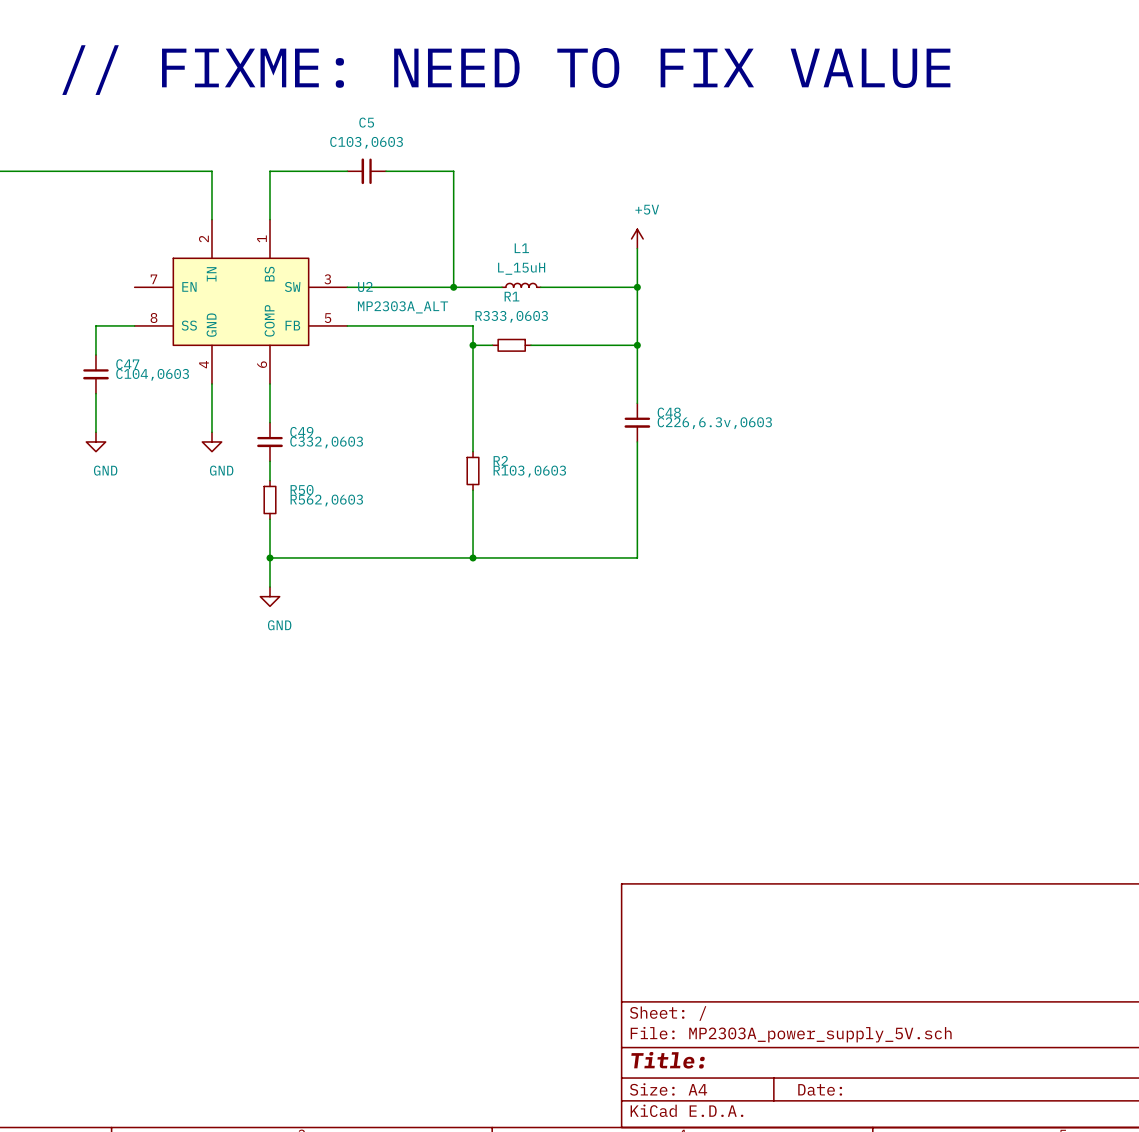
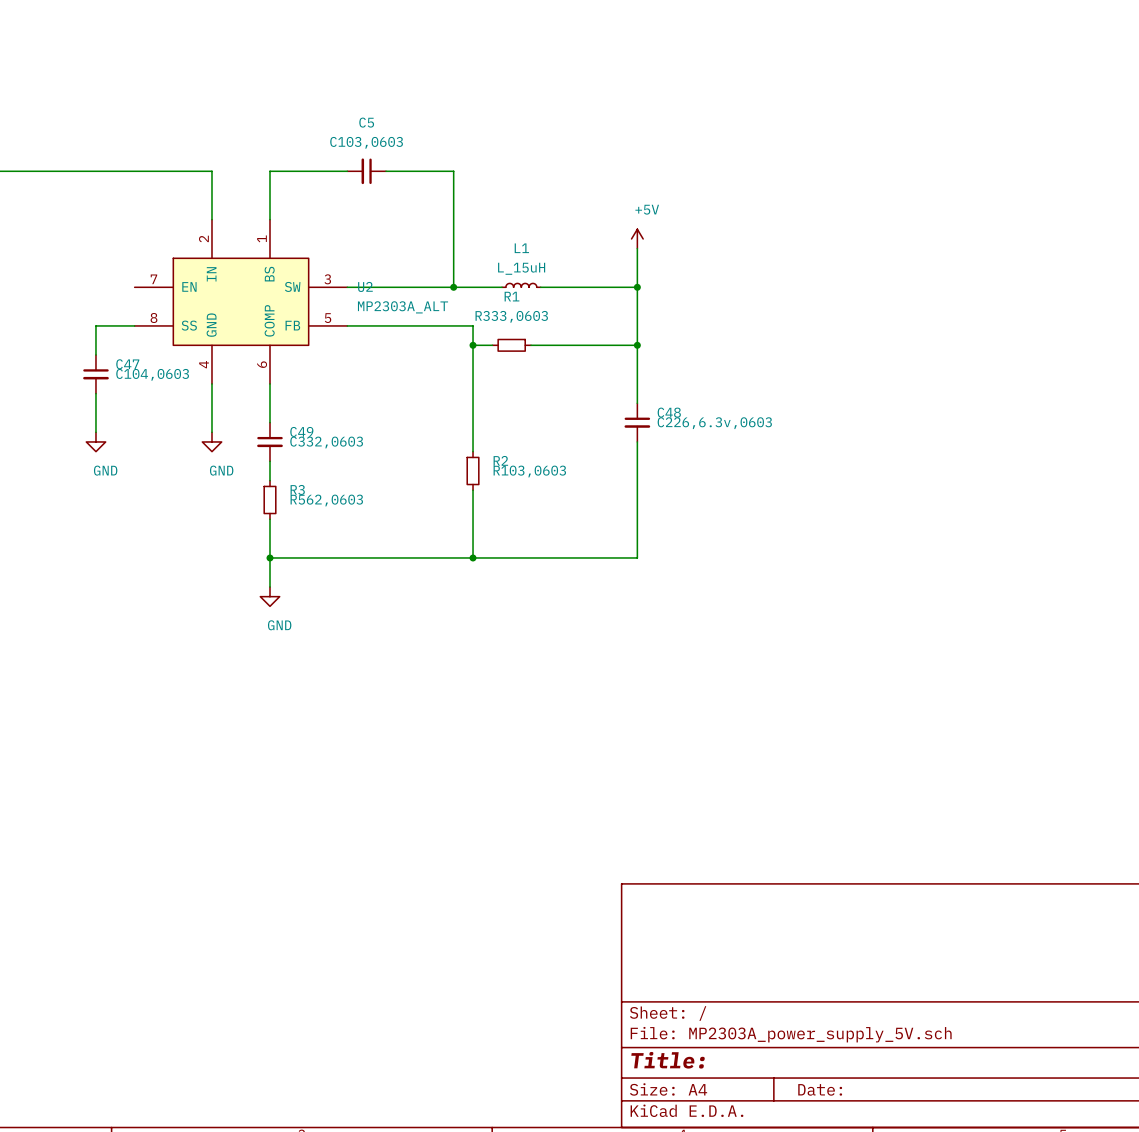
text: // FIXME: NEED TO FIX VALUE (506, 70) -> none
R50 name: R50 (302, 489) -> R3 (297, 489)

